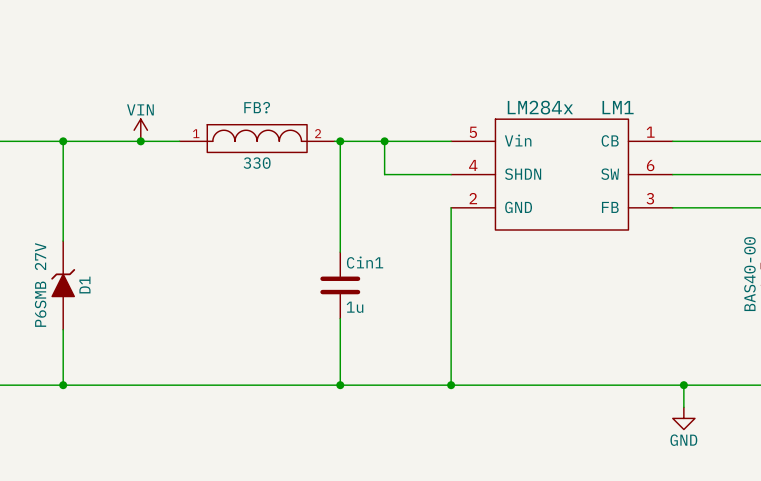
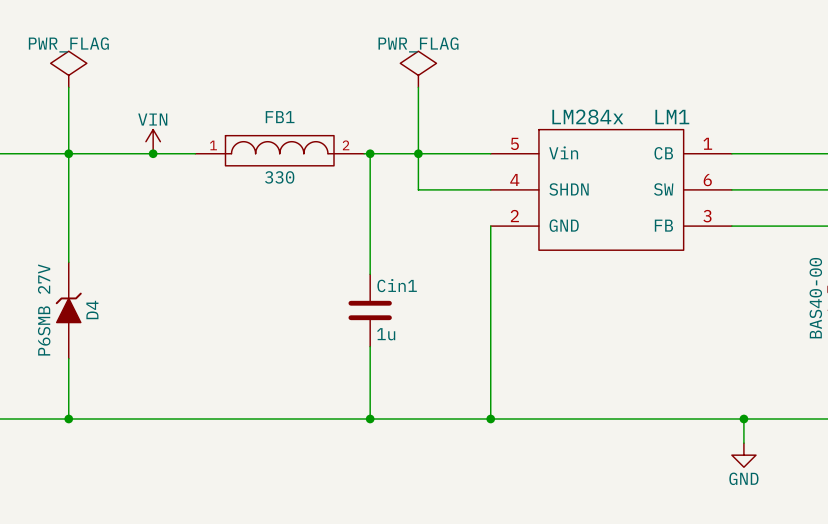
power symbol: none -> PWR_FLAG (68, 69)
power symbol: none -> PWR_FLAG (418, 69)
wire: none -> (68, 87) (68, 153)
wire: none -> (418, 87) (418, 153)
FB? name: FB? (257, 107) -> FB1 (280, 117)
D1 name: D1 (84, 285) -> D4 (92, 309)

